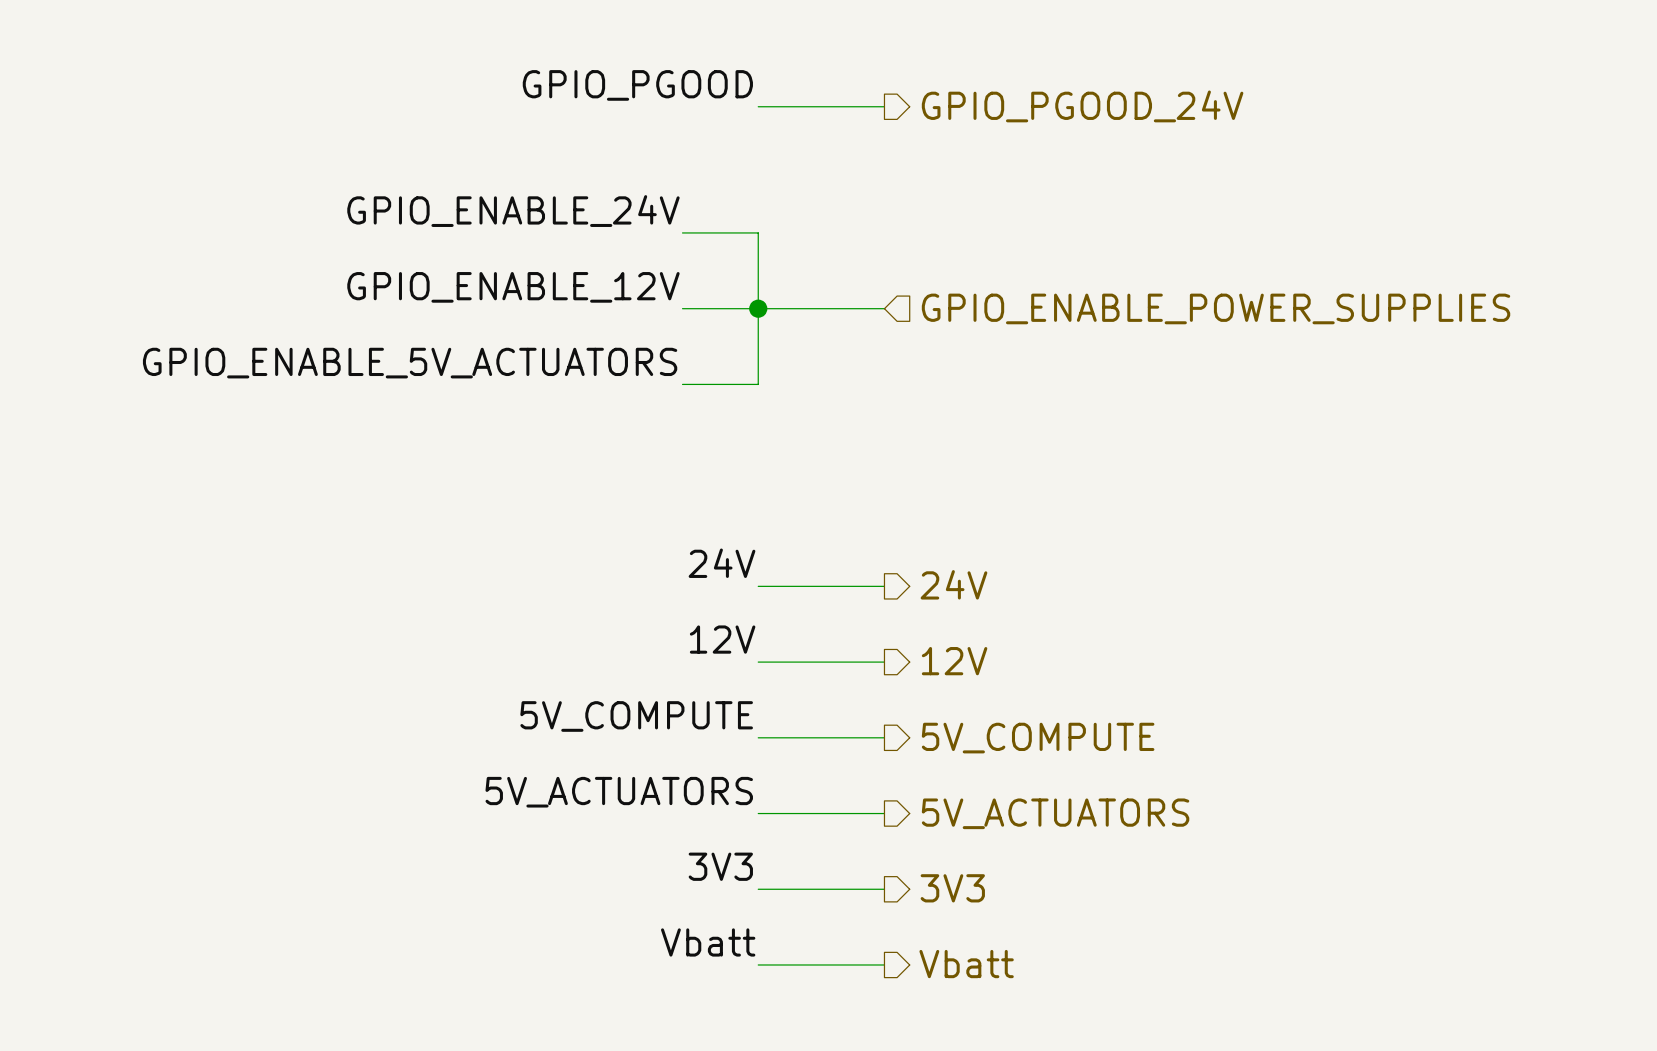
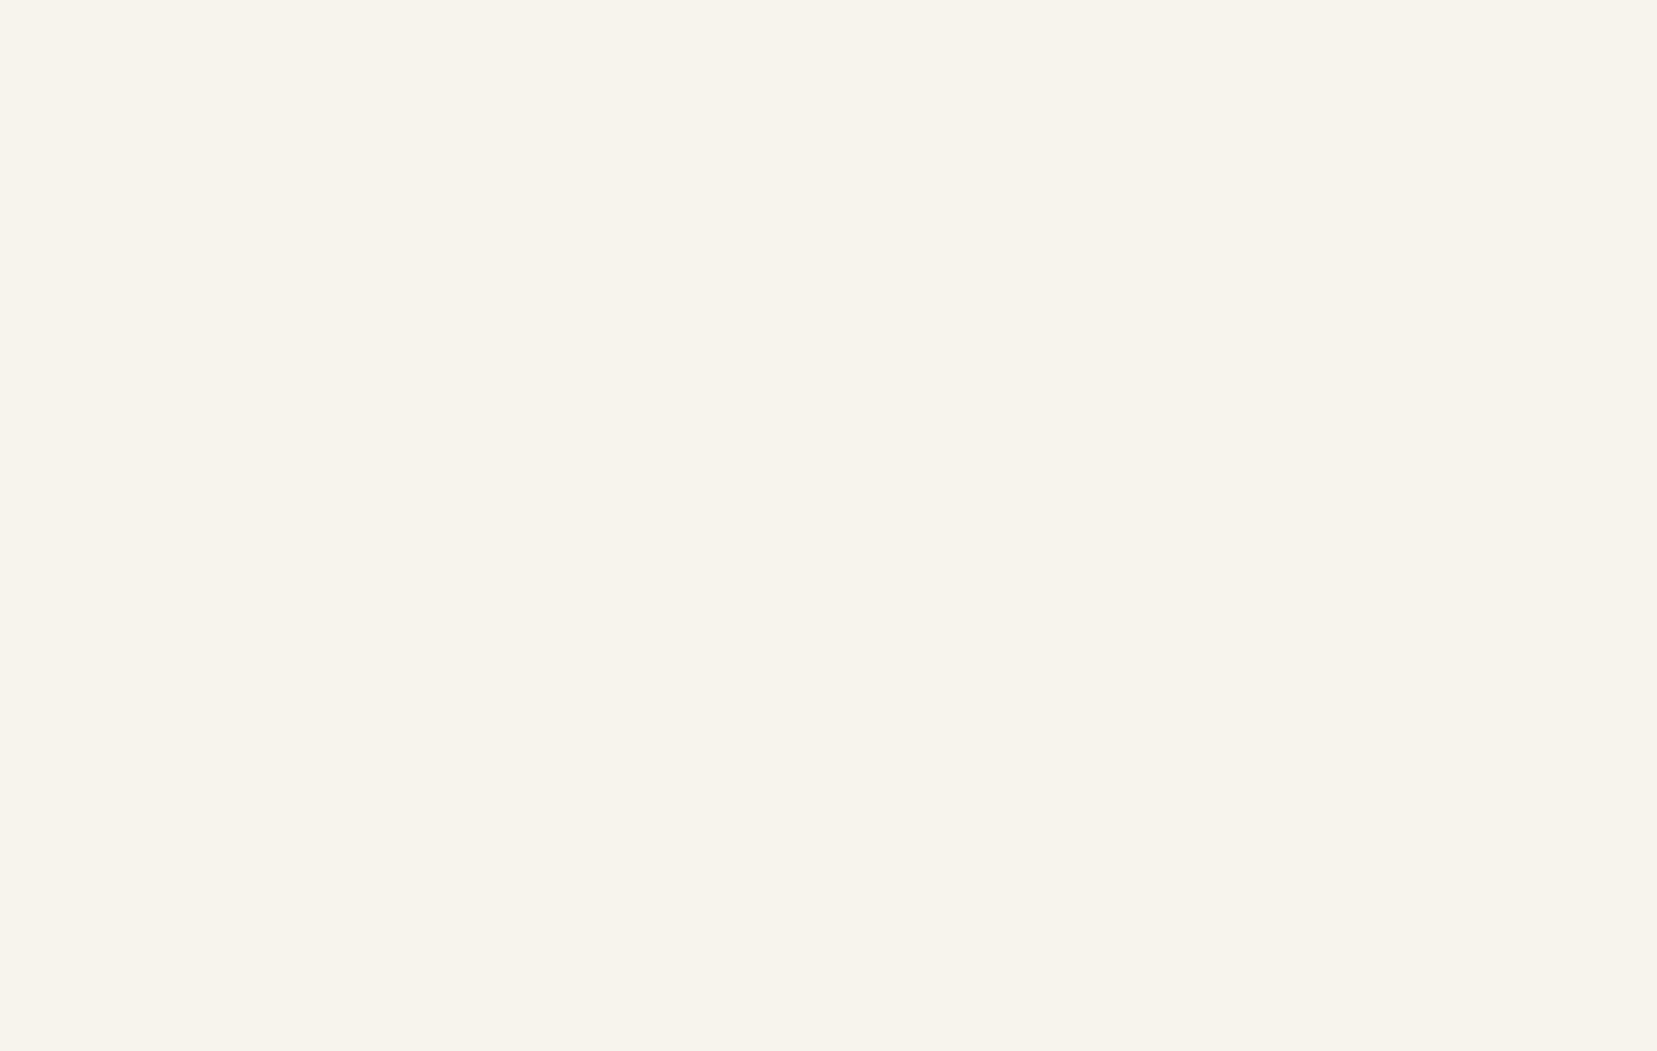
label: GPIO_PGOOD (637, 85) -> none
wire: (758, 106) (884, 106) -> none
hierarchical label: GPIO_PGOOD_24V (1082, 106) -> none
label: GPIO_ENABLE_24V (513, 211) -> none
wire: (682, 232) (758, 232) (758, 384) (682, 384) -> none
label: GPIO_ENABLE_12V (513, 287) -> none
wire: (682, 308) (884, 308) -> none
junction: (758, 308) -> none
hierarchical label: GPIO_ENABLE_POWER_SUPPLIES (1216, 308) -> none
label: GPIO_ENABLE_5V_ACTUATORS (410, 363) -> none
label: 24V (722, 563) -> none
hierarchical label: 24V (953, 584) -> none
wire: (758, 586) (884, 586) -> none
label: 12V (722, 639) -> none
hierarchical label: 12V (954, 661) -> none
wire: (758, 662) (884, 662) -> none
label: 5V_COMPUTE (636, 716) -> none
wire: (758, 737) (884, 737) -> none
hierarchical label: 5V_COMPUTE (1038, 738) -> none
label: 5V_ACTUATORS (619, 792) -> none
wire: (758, 813) (884, 813) -> none
hierarchical label: 5V_ACTUATORS (1055, 813) -> none
label: 3V3 (720, 866) -> none
hierarchical label: 3V3 (952, 888) -> none
wire: (758, 889) (884, 889) -> none
label: Vbatt (708, 942) -> none
wire: (758, 964) (884, 964) -> none
hierarchical label: Vbatt (966, 964) -> none

